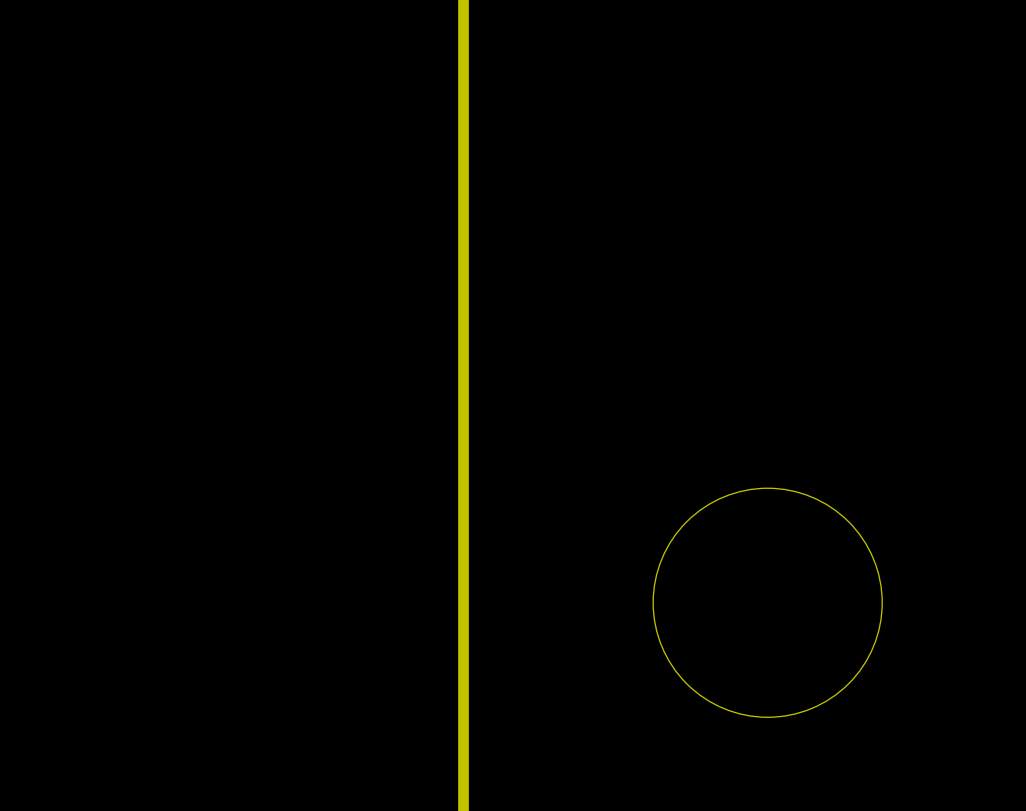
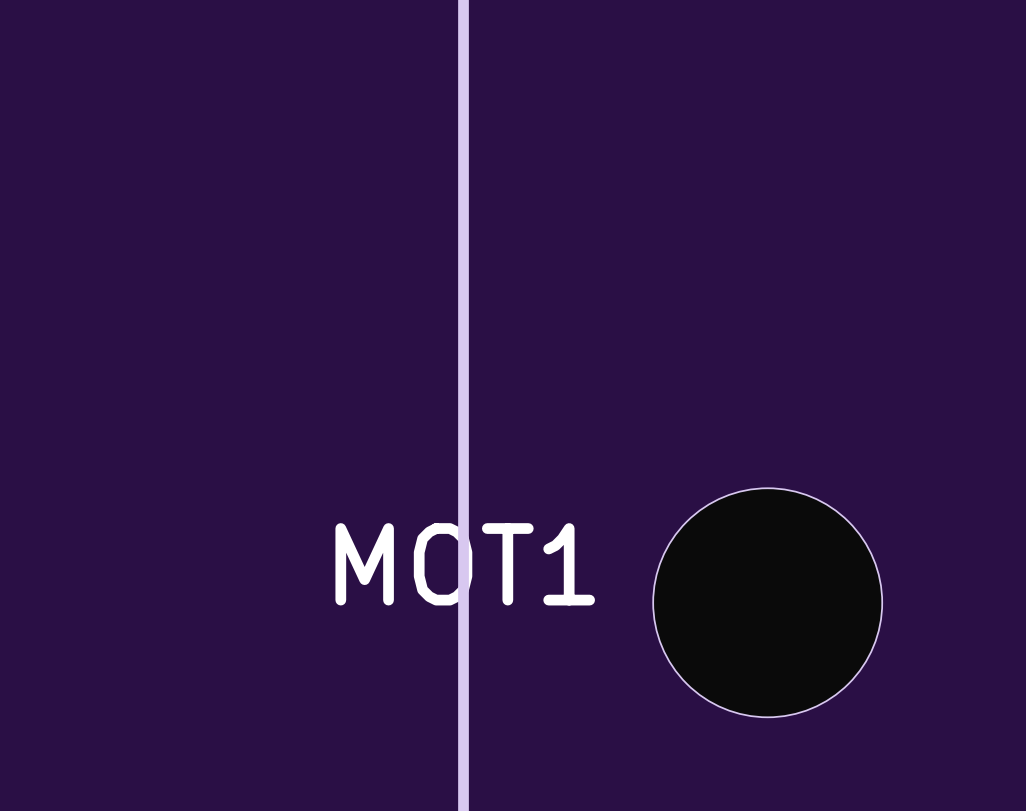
MOT1: none -> (465, 564)

